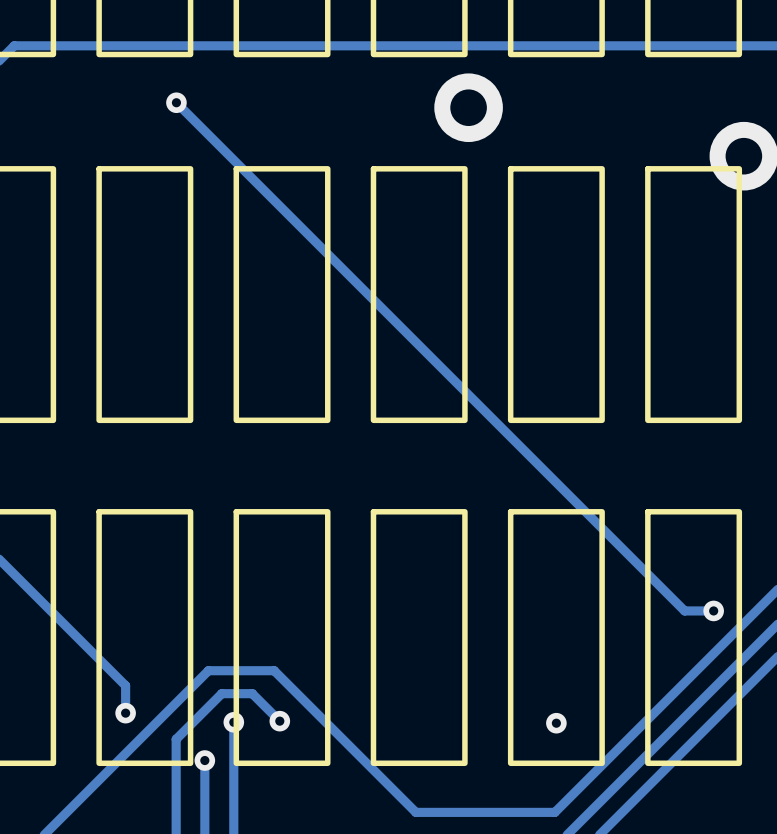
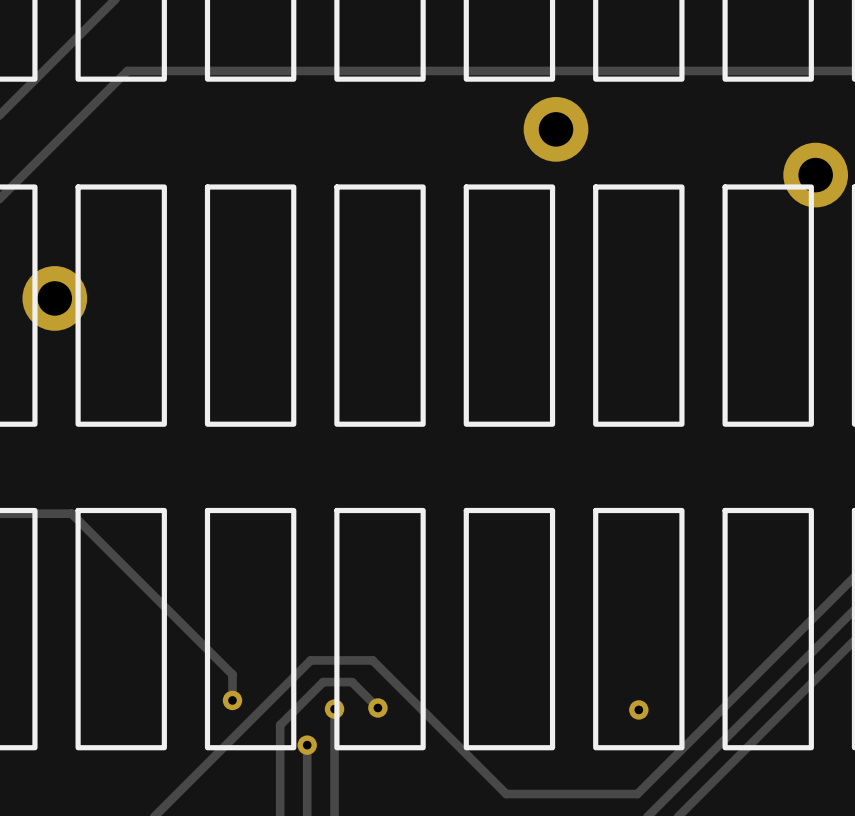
track: (176, 102) (684, 610) (713, 610) -> none
via: (176, 102) -> none
via: (713, 610) -> none

